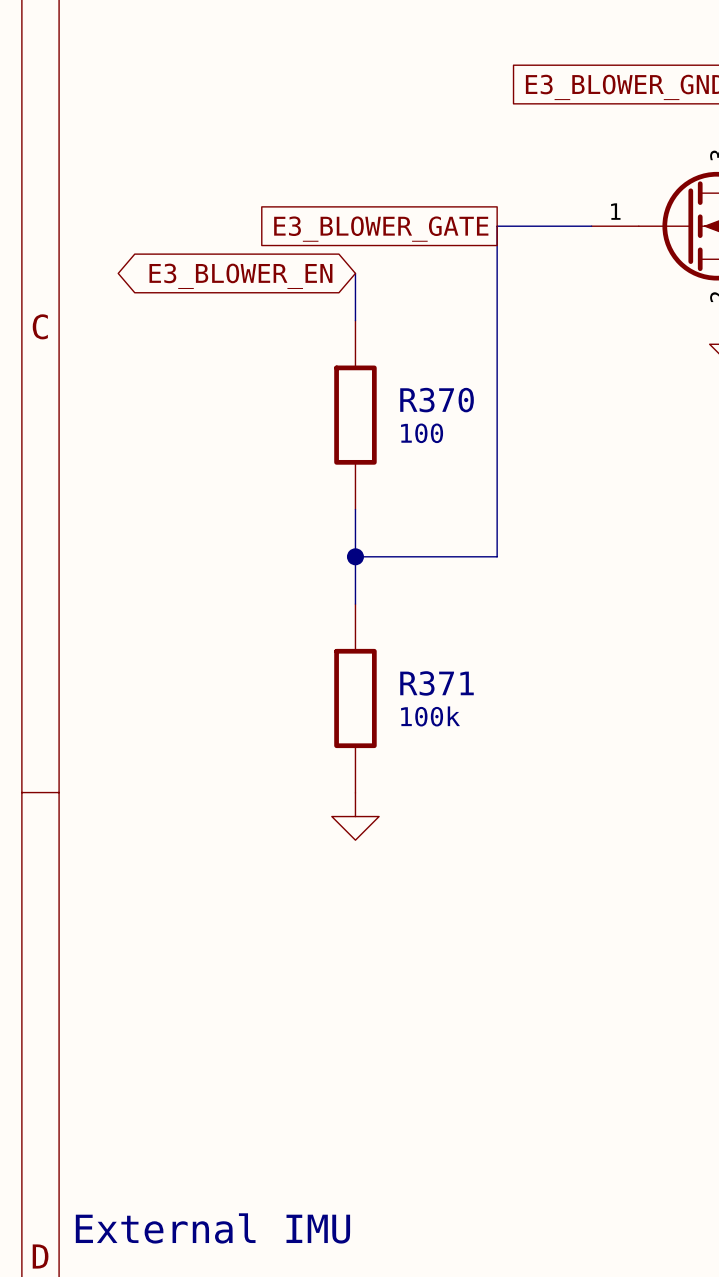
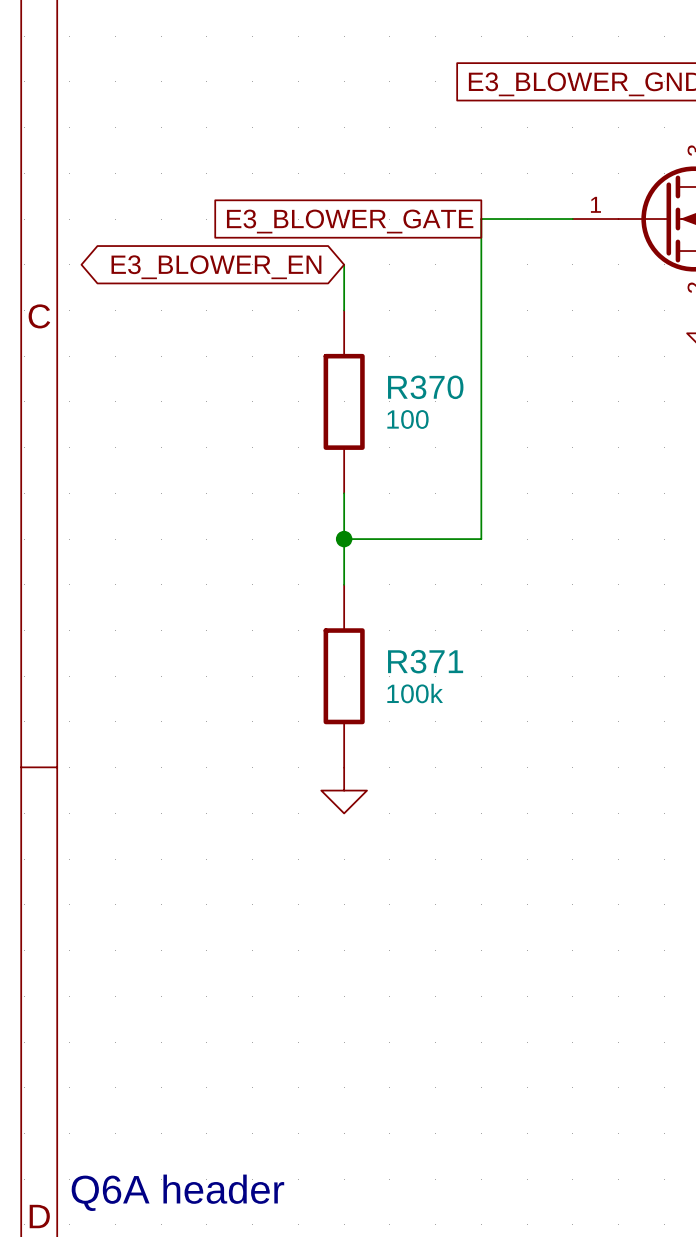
text: External IMU (212, 1228) -> Q6A header (177, 1192)

